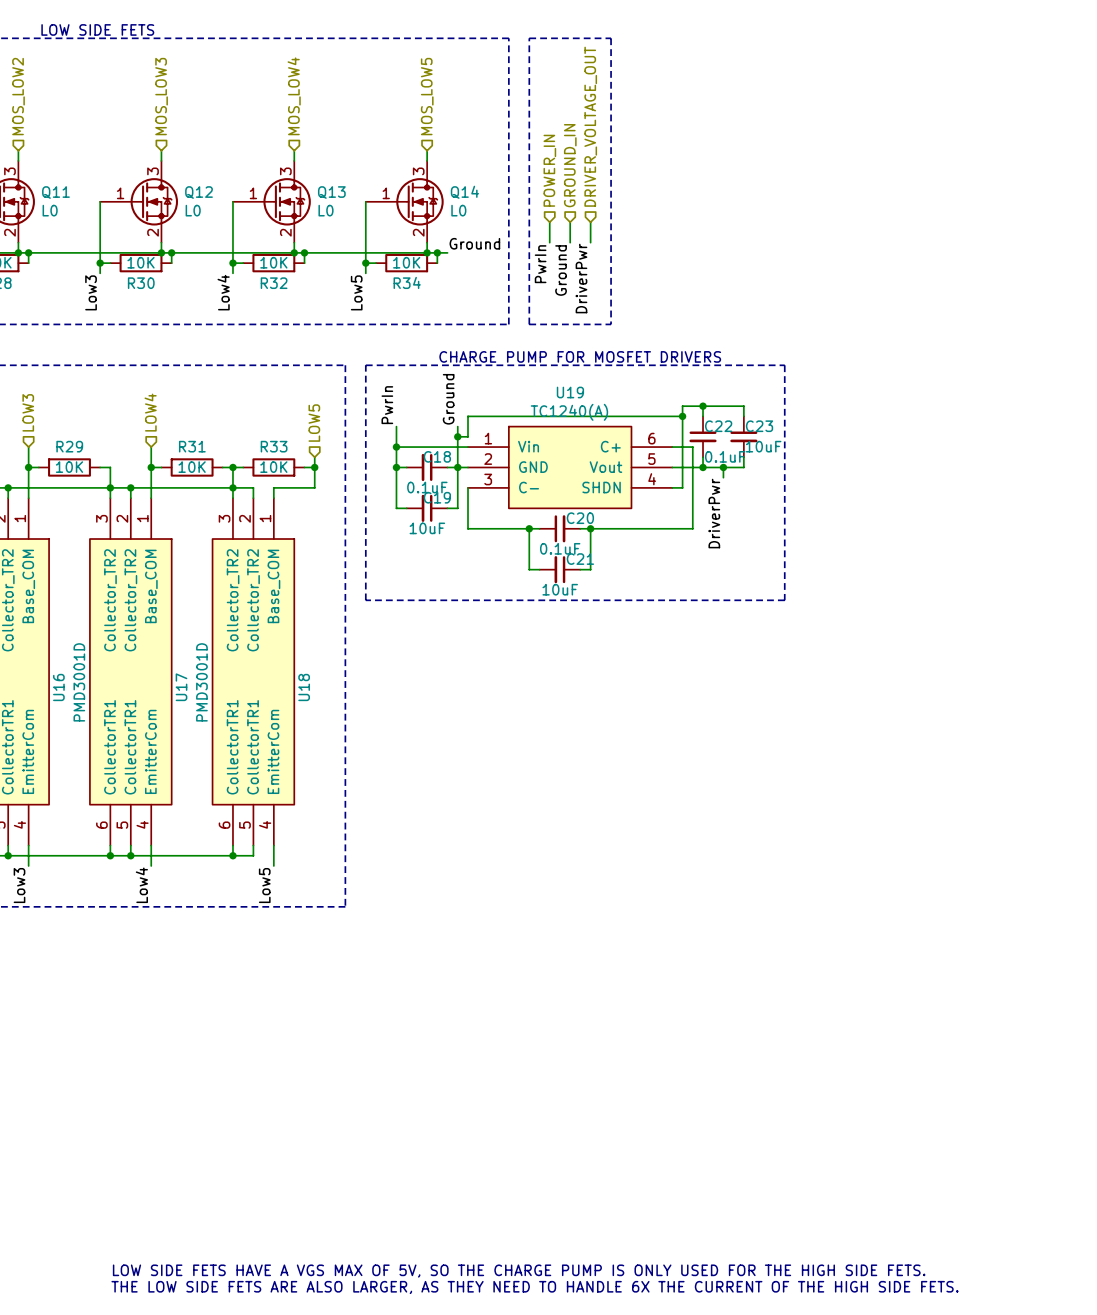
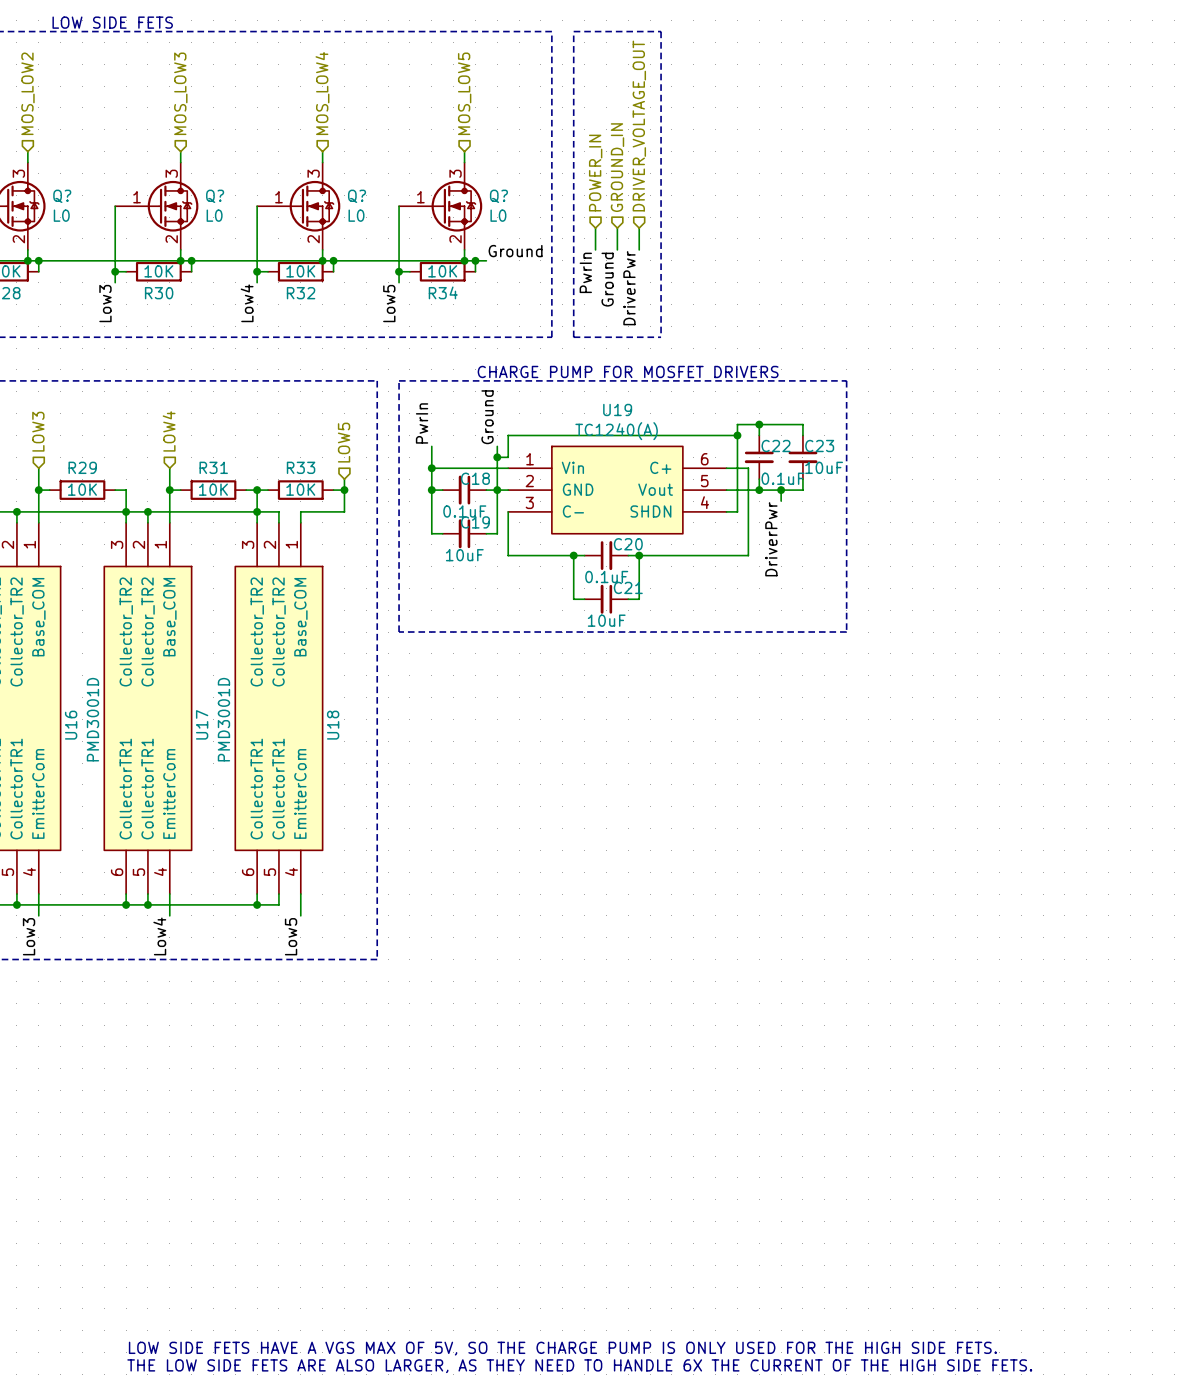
Q11 name: Q11 (55, 192) -> Q? (62, 196)
Q12 name: Q12 (199, 192) -> Q? (215, 196)
Q13 name: Q13 (331, 192) -> Q? (357, 196)
Q14 name: Q14 (464, 192) -> Q? (498, 196)

